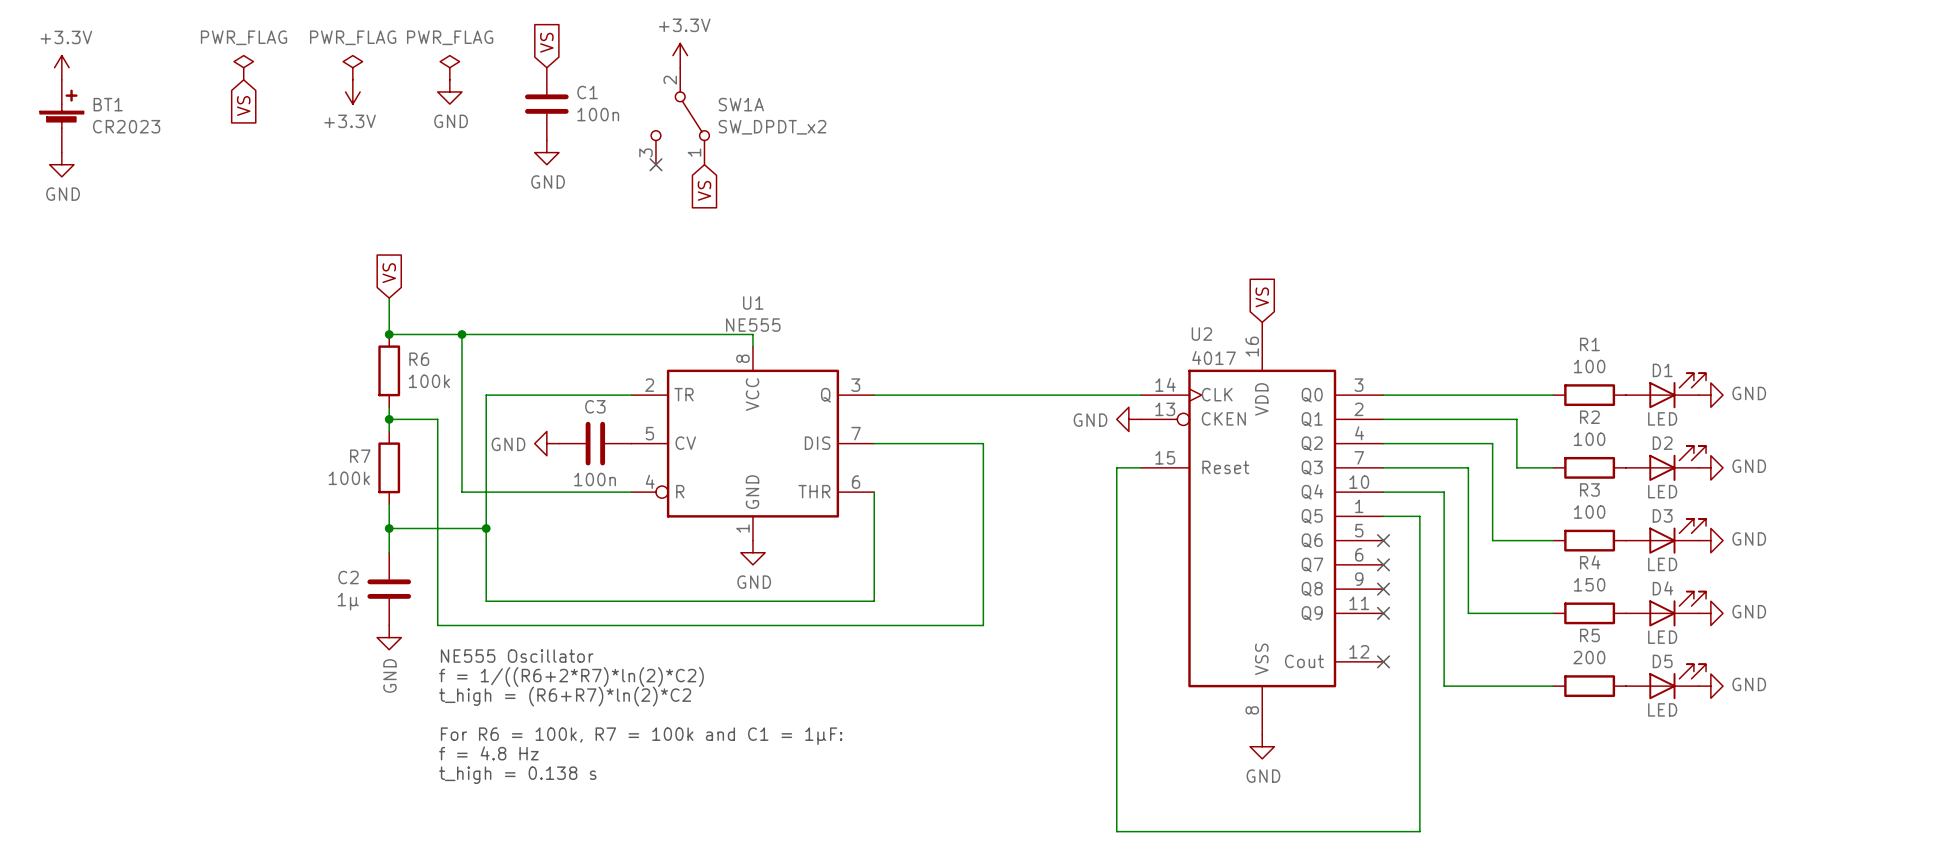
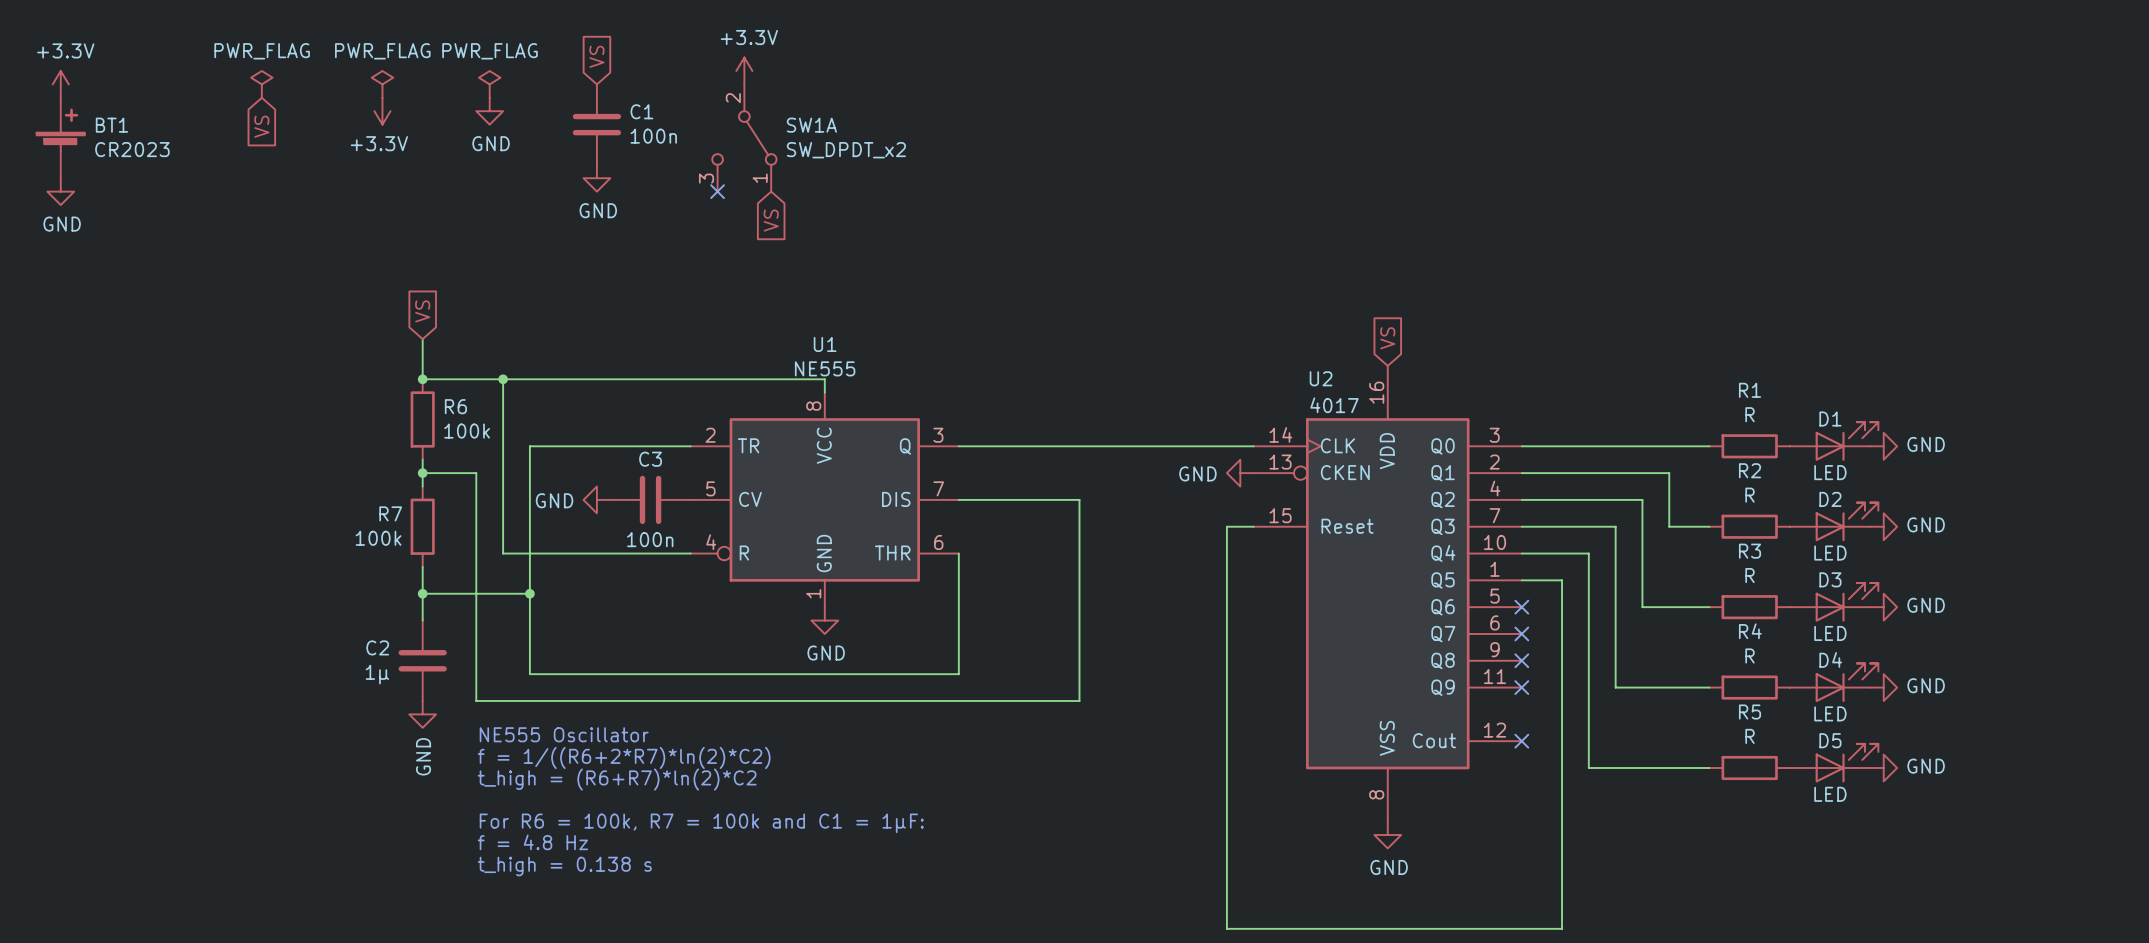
R1 value: 100 (1589, 366) -> R (1750, 414)
R2 value: 100 (1589, 439) -> R (1750, 495)
R3 value: 100 (1589, 512) -> R (1750, 575)
R4 value: 150 (1589, 584) -> R (1750, 655)
R5 value: 200 (1589, 657) -> R (1750, 736)

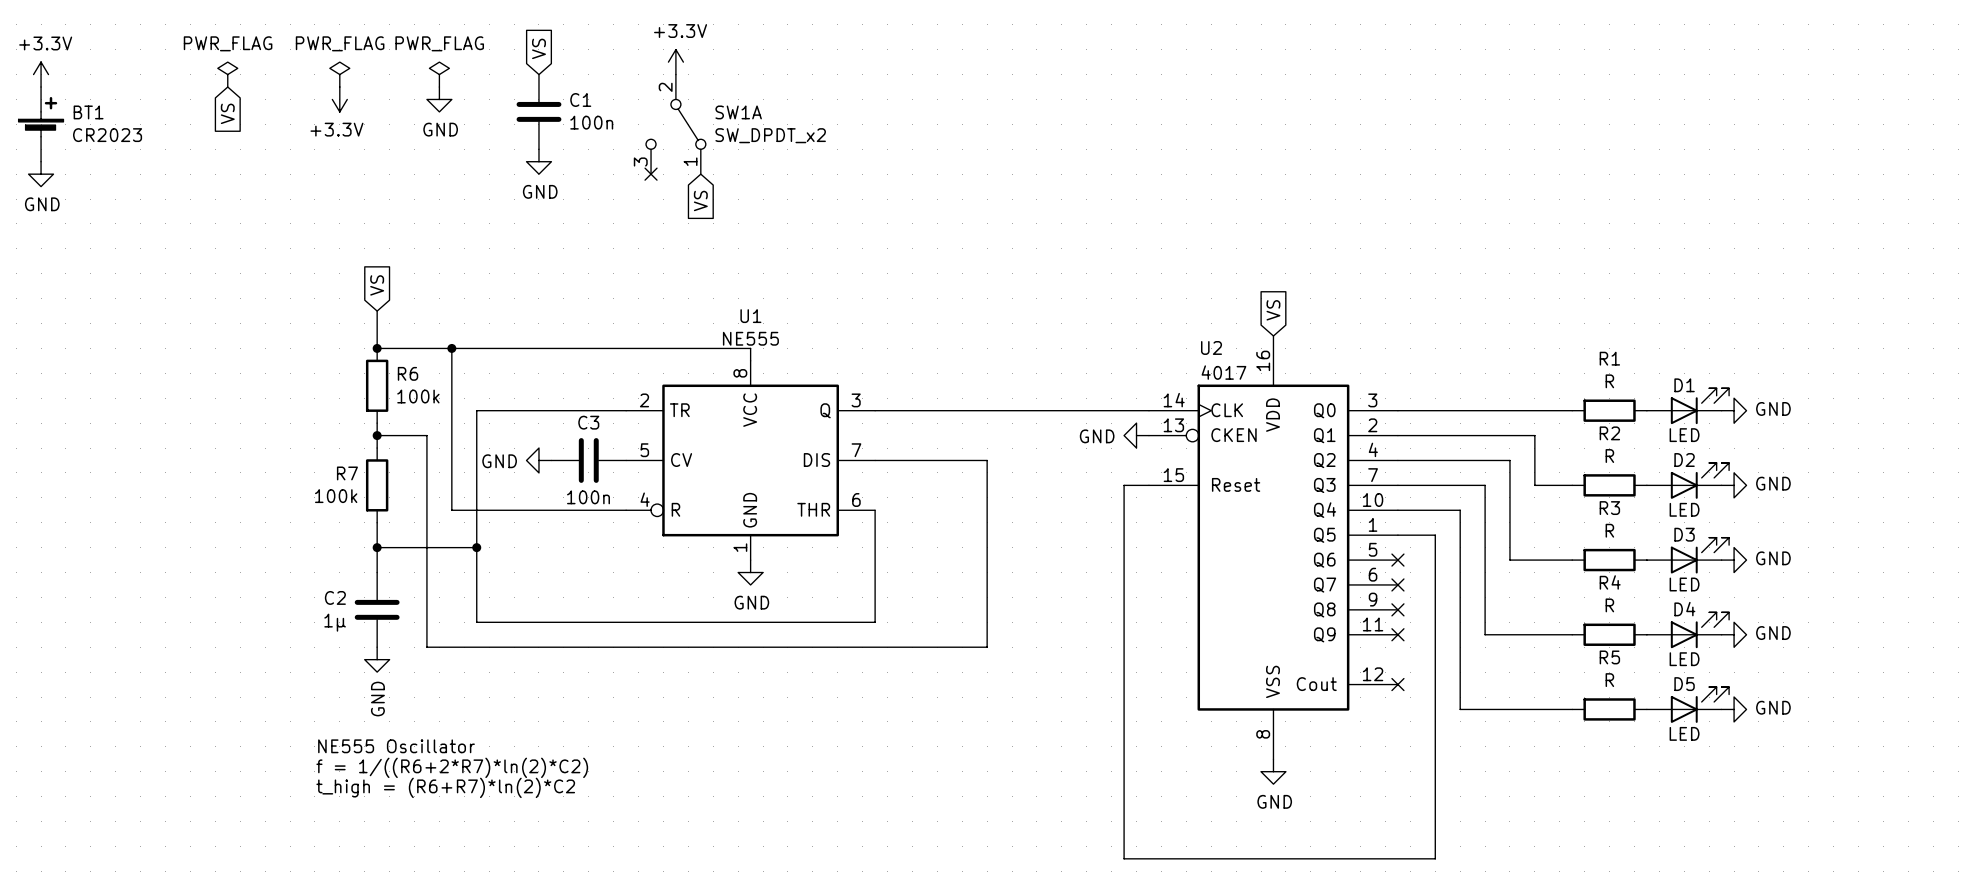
text position: NE555 Oscillator (564, 734) -> NE555 Oscillator (396, 746)
text position: f = 1/((R6+2*R7)*ln(2)*C2) (624, 757) -> f = 1/((R6+2*R7)*ln(2)*C2) (452, 767)
text position: t_high = (R6+R7)*ln(2)*C2 (617, 779) -> t_high = (R6+R7)*ln(2)*C2 (445, 787)
text: For R6 = 100k, R7 = 100k and C1 = 1µF: (701, 823) -> none
text: f = 4.8 Hz (532, 842) -> none
text: t_high = 0.138 s (564, 866) -> none

